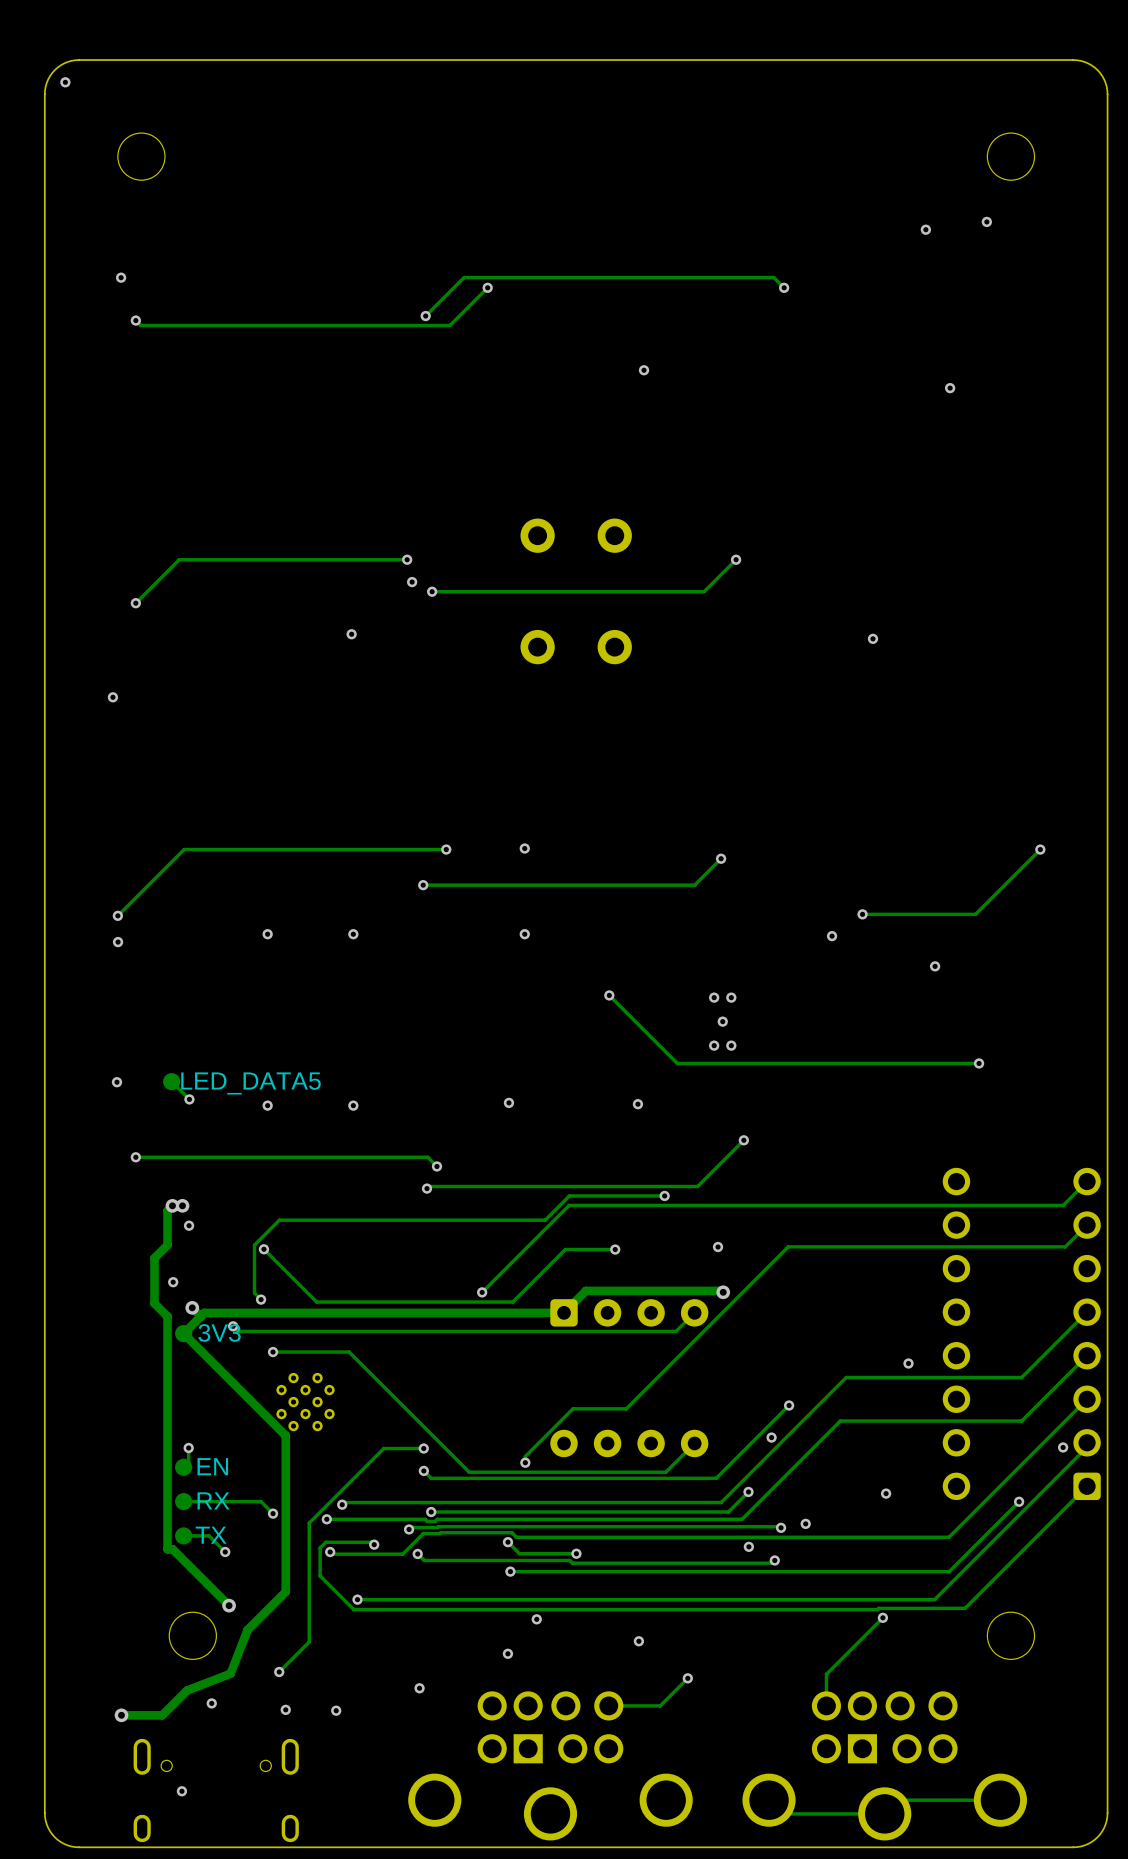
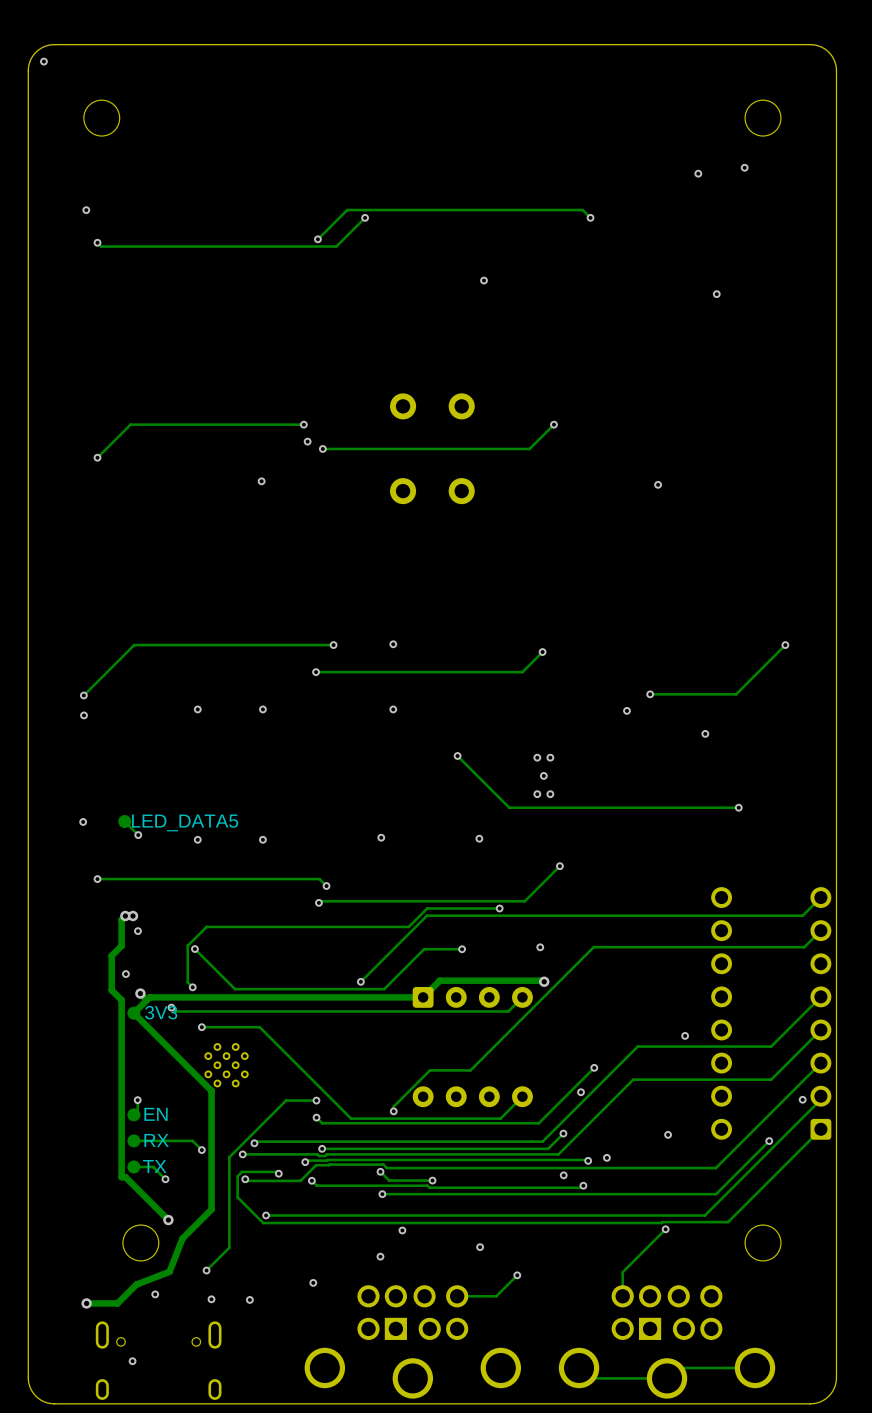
via: (112, 697) -> none

